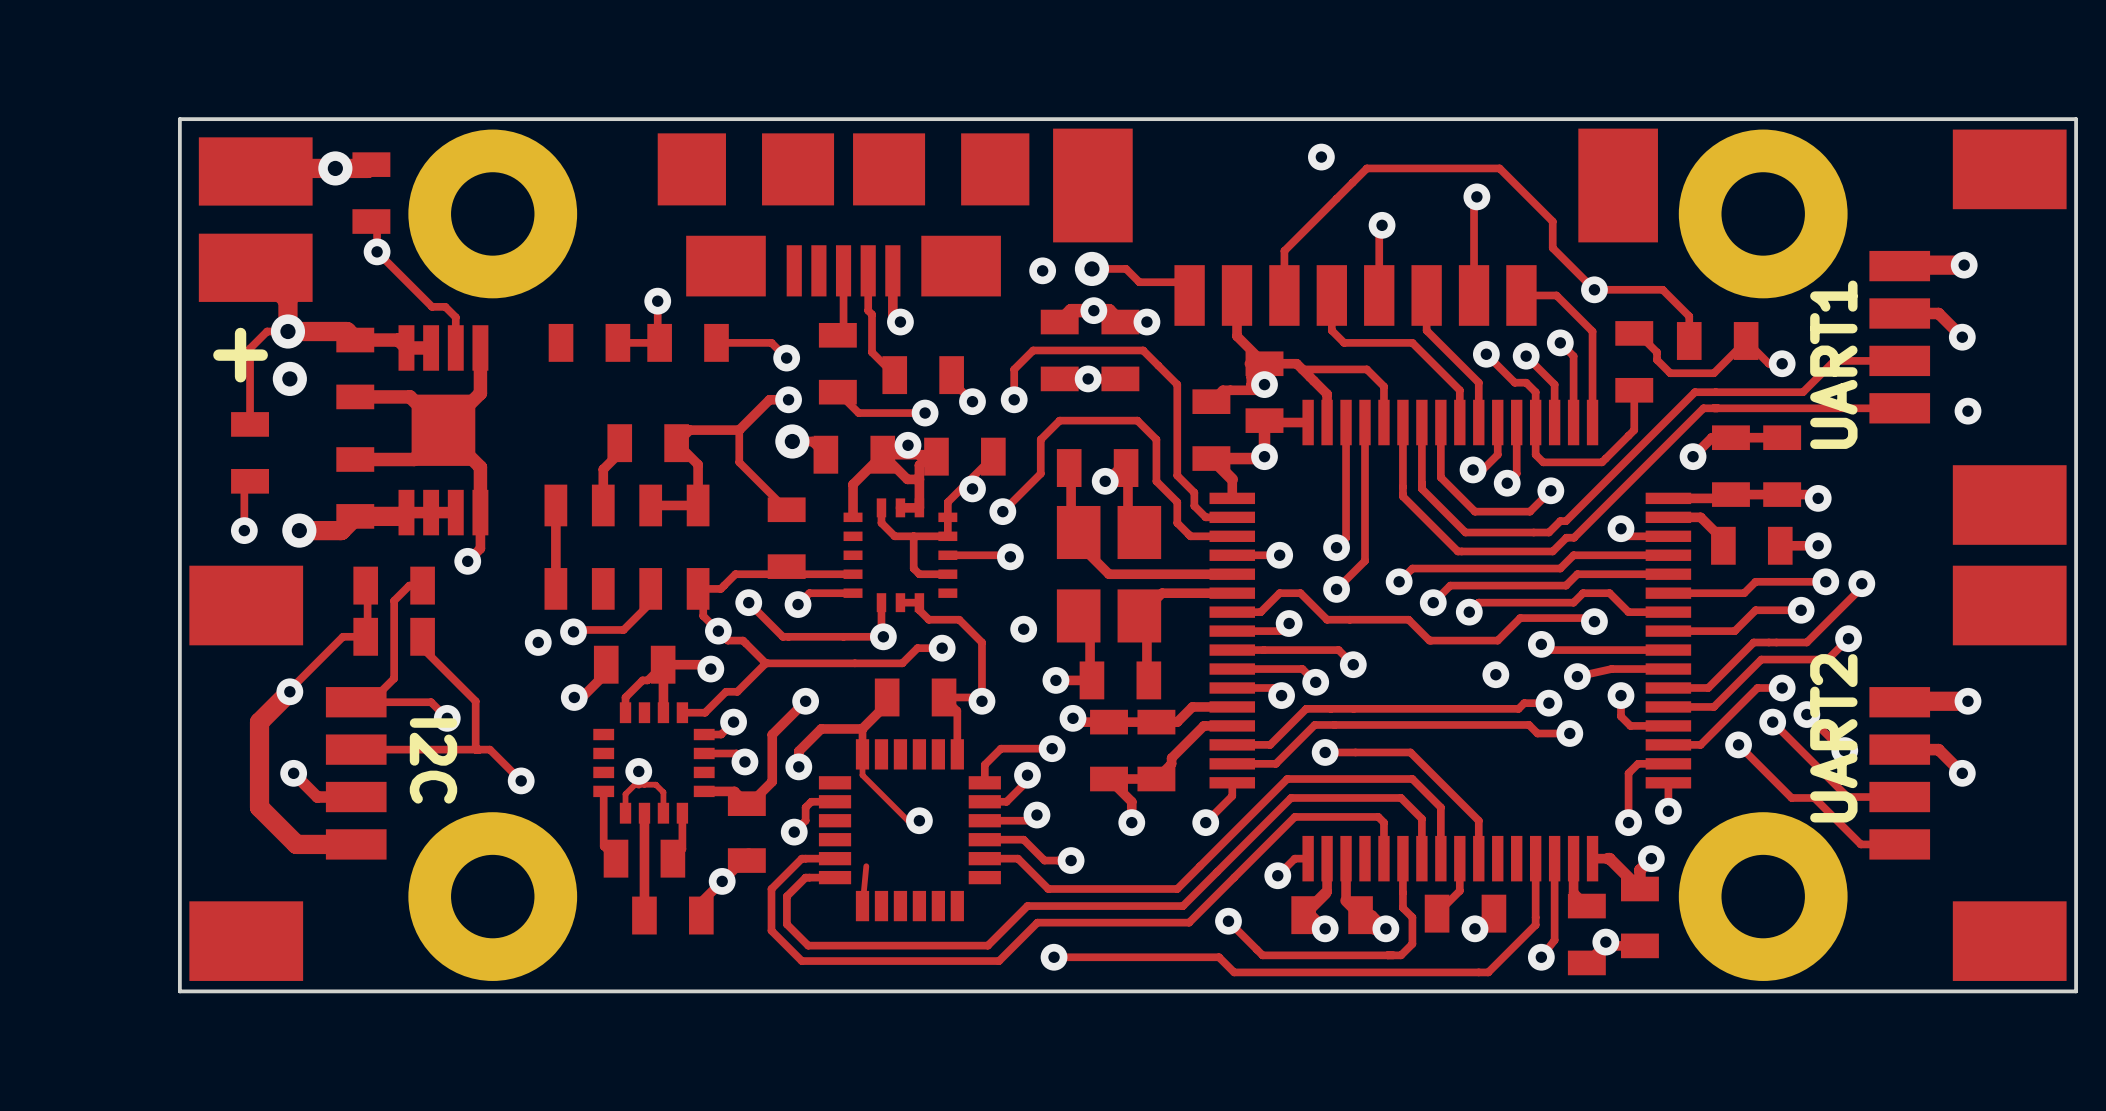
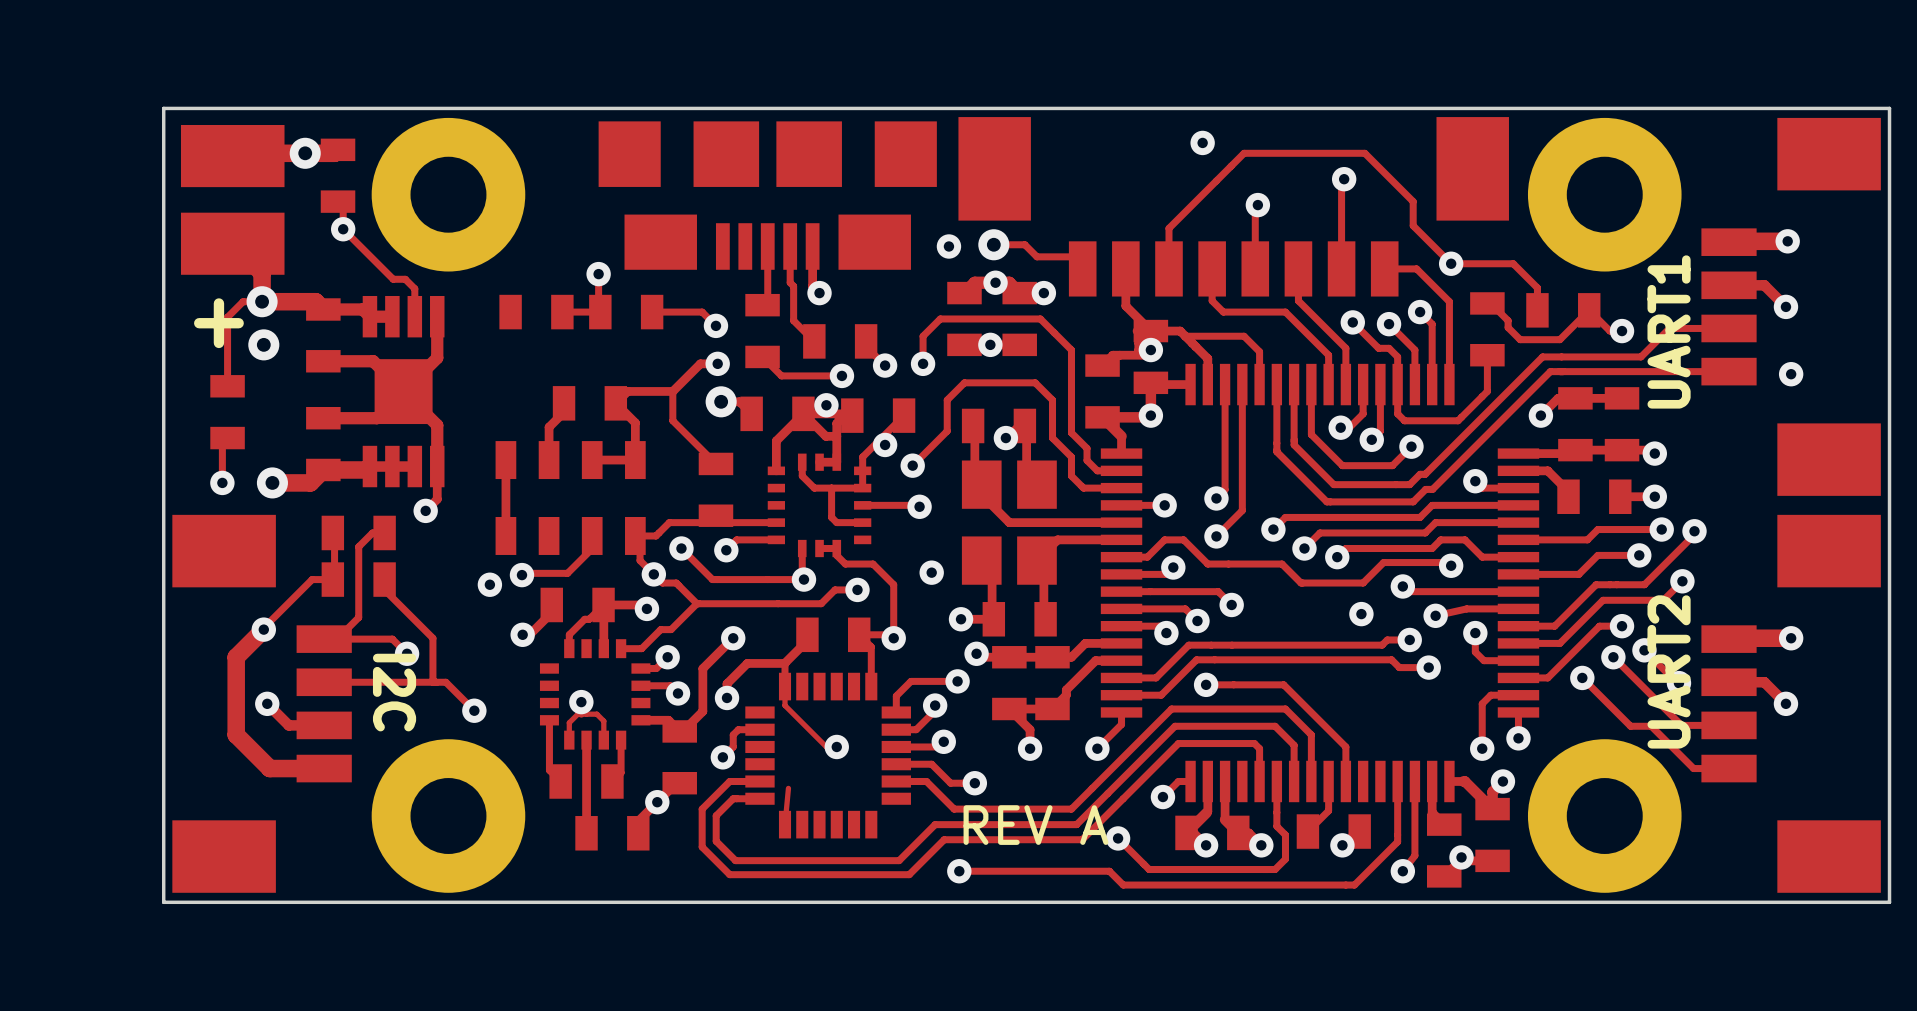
text: none -> REV A (1035, 825)

